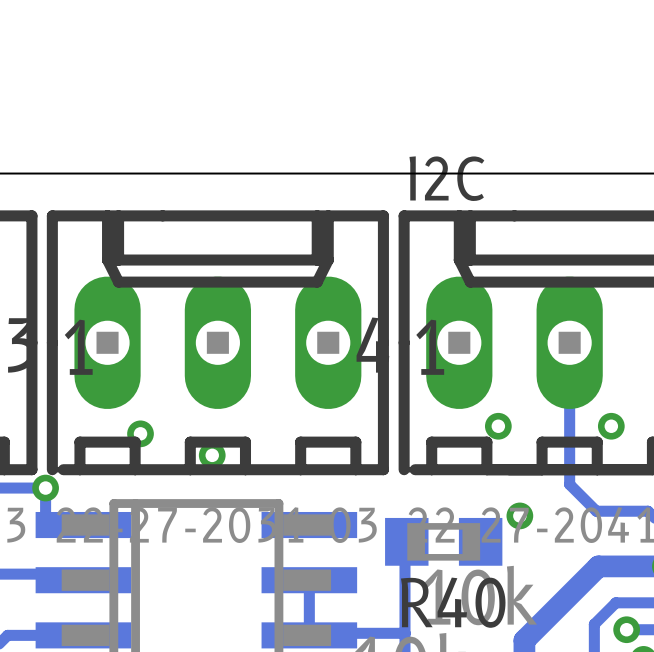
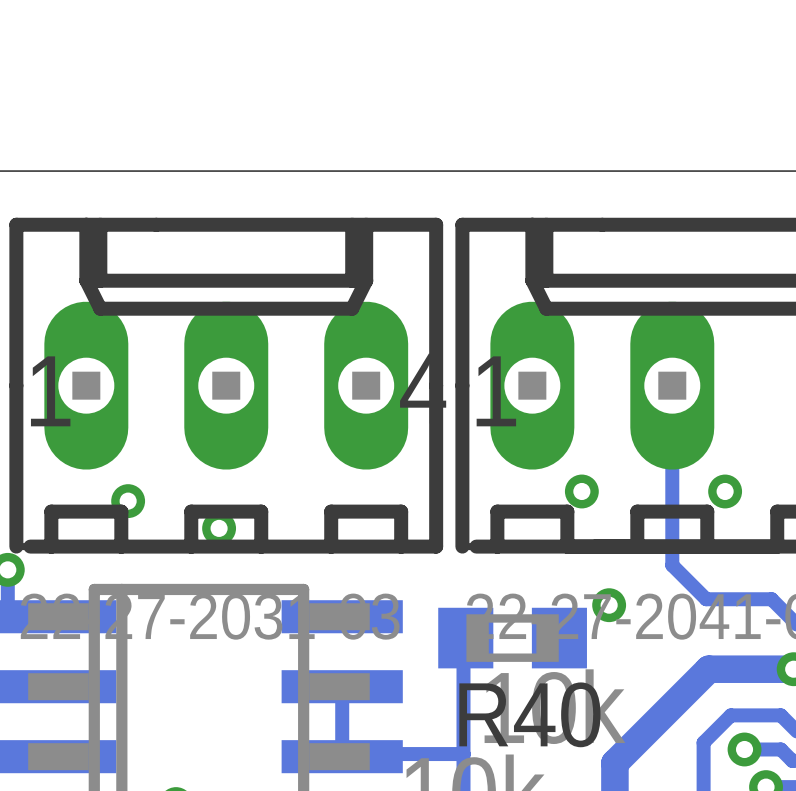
I2C name: I2C (446, 178) -> none

